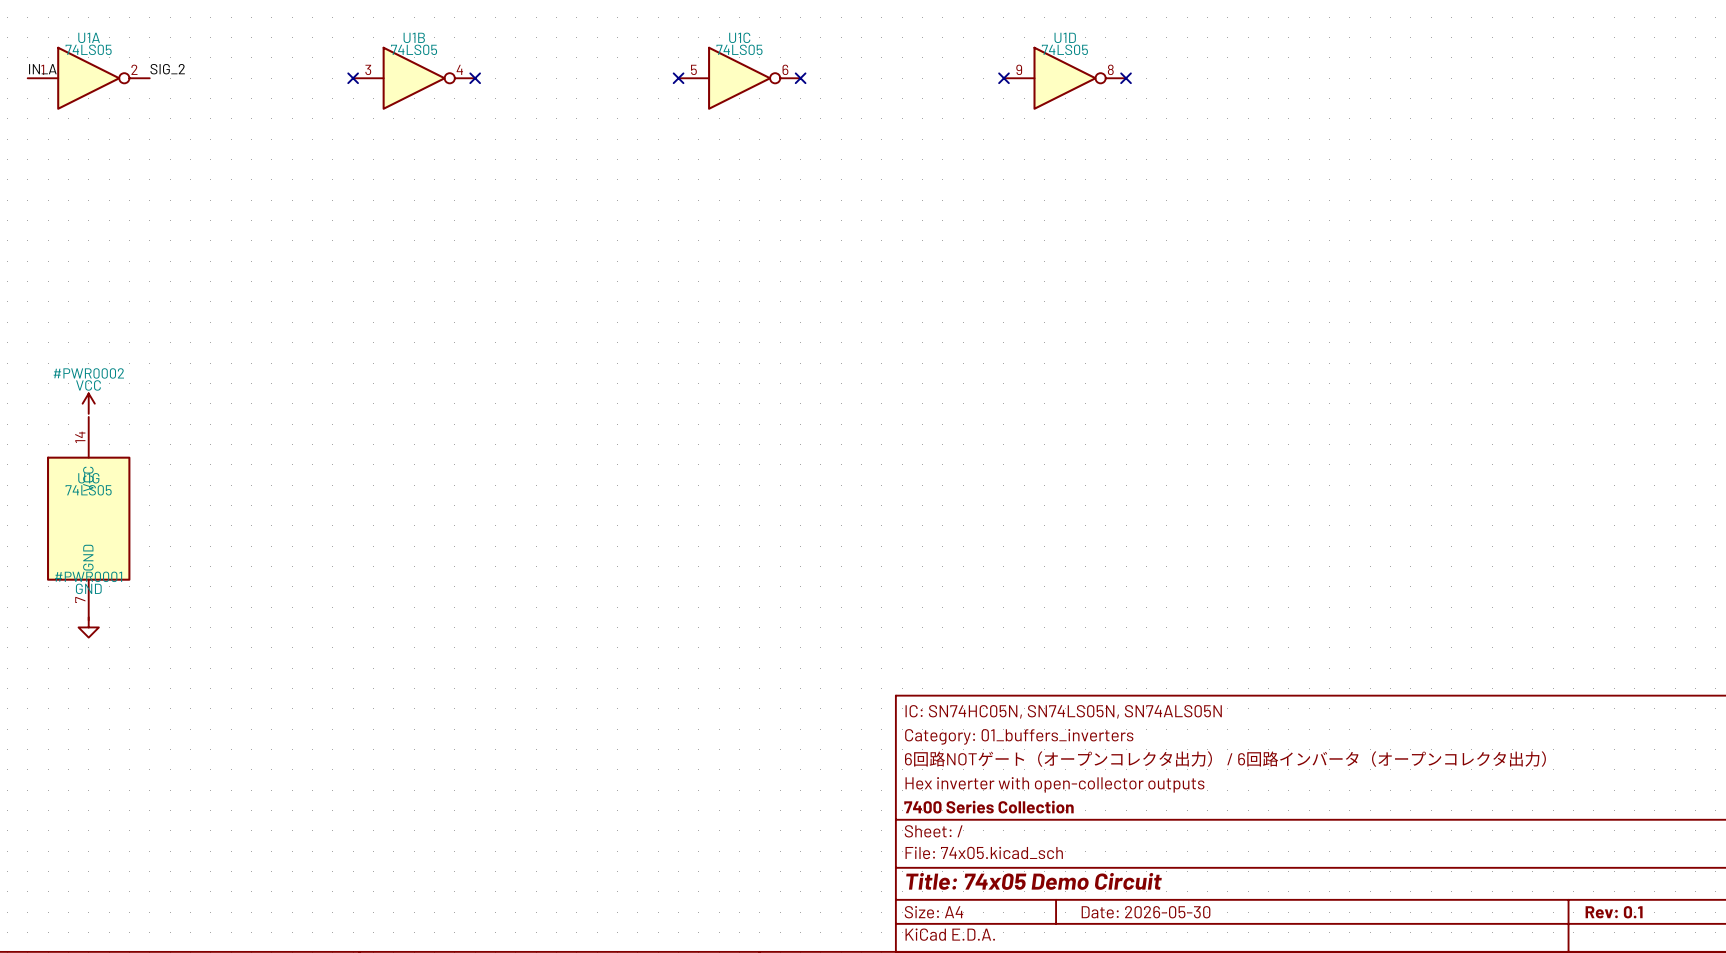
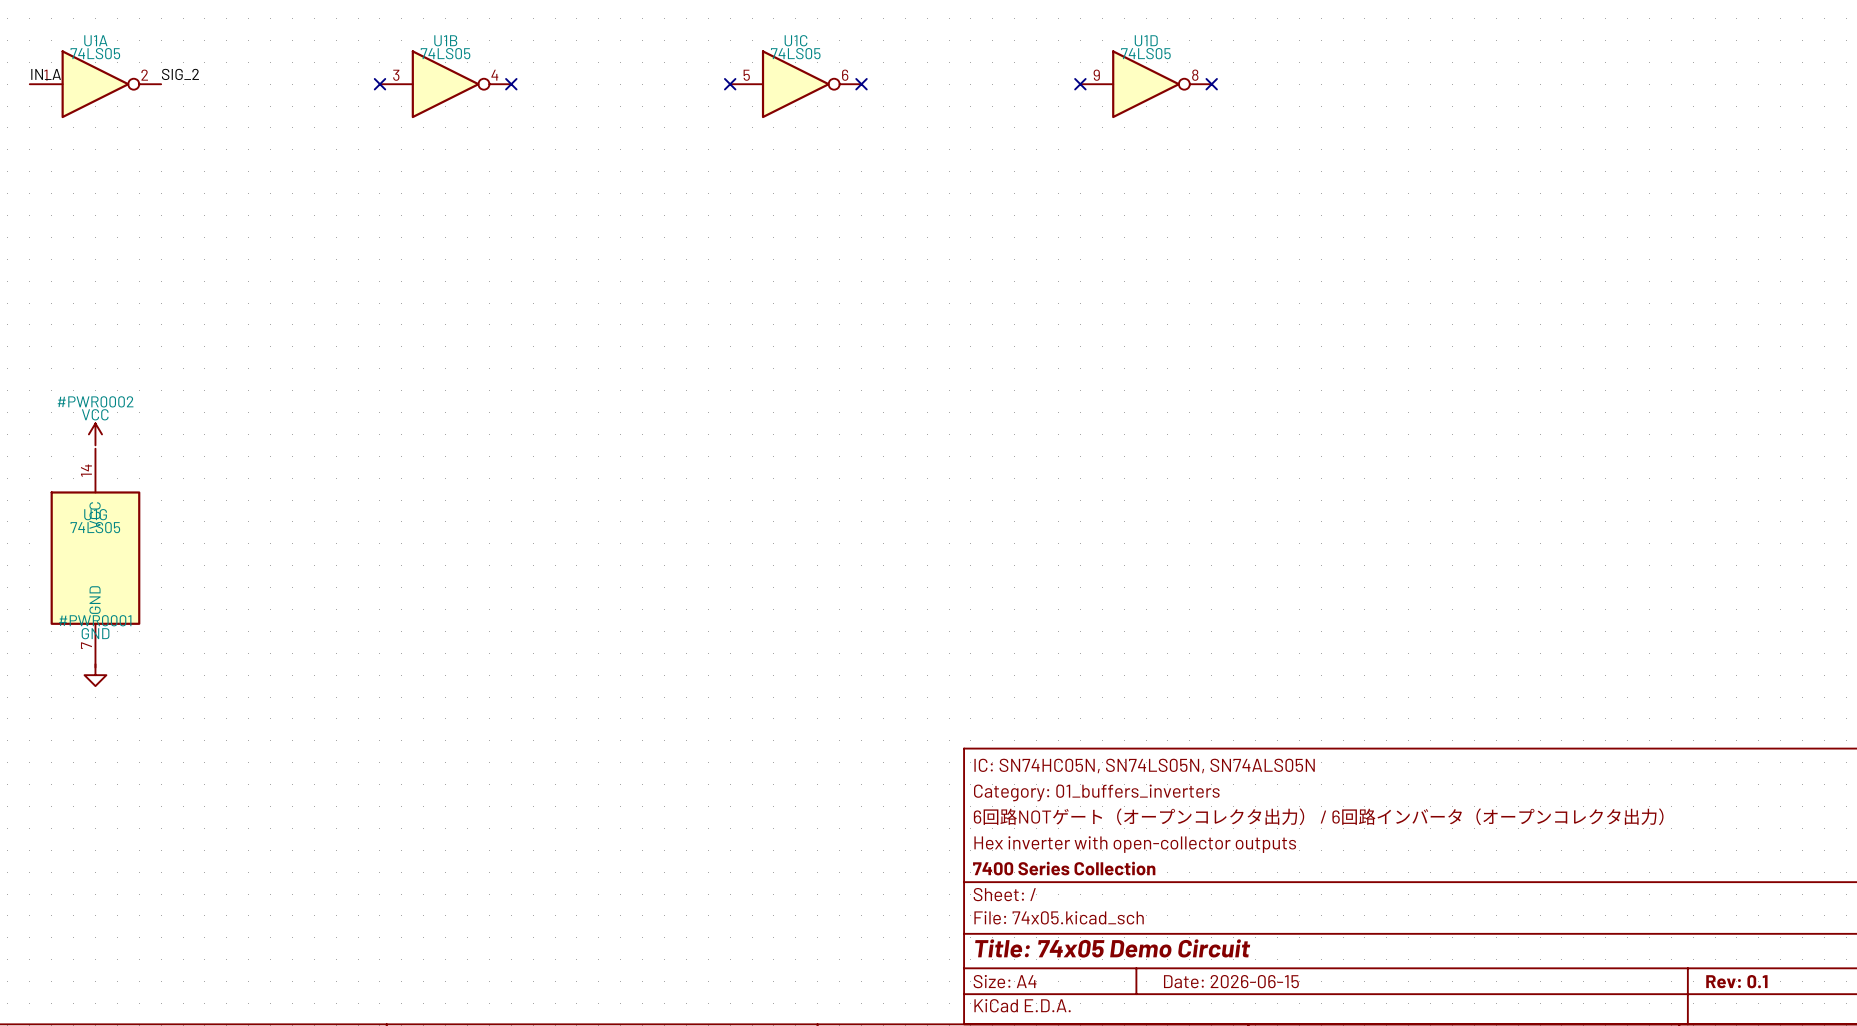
title block: Date: 2026-05-30 (1146, 912) -> Date: 2026-06-15 (1231, 981)

